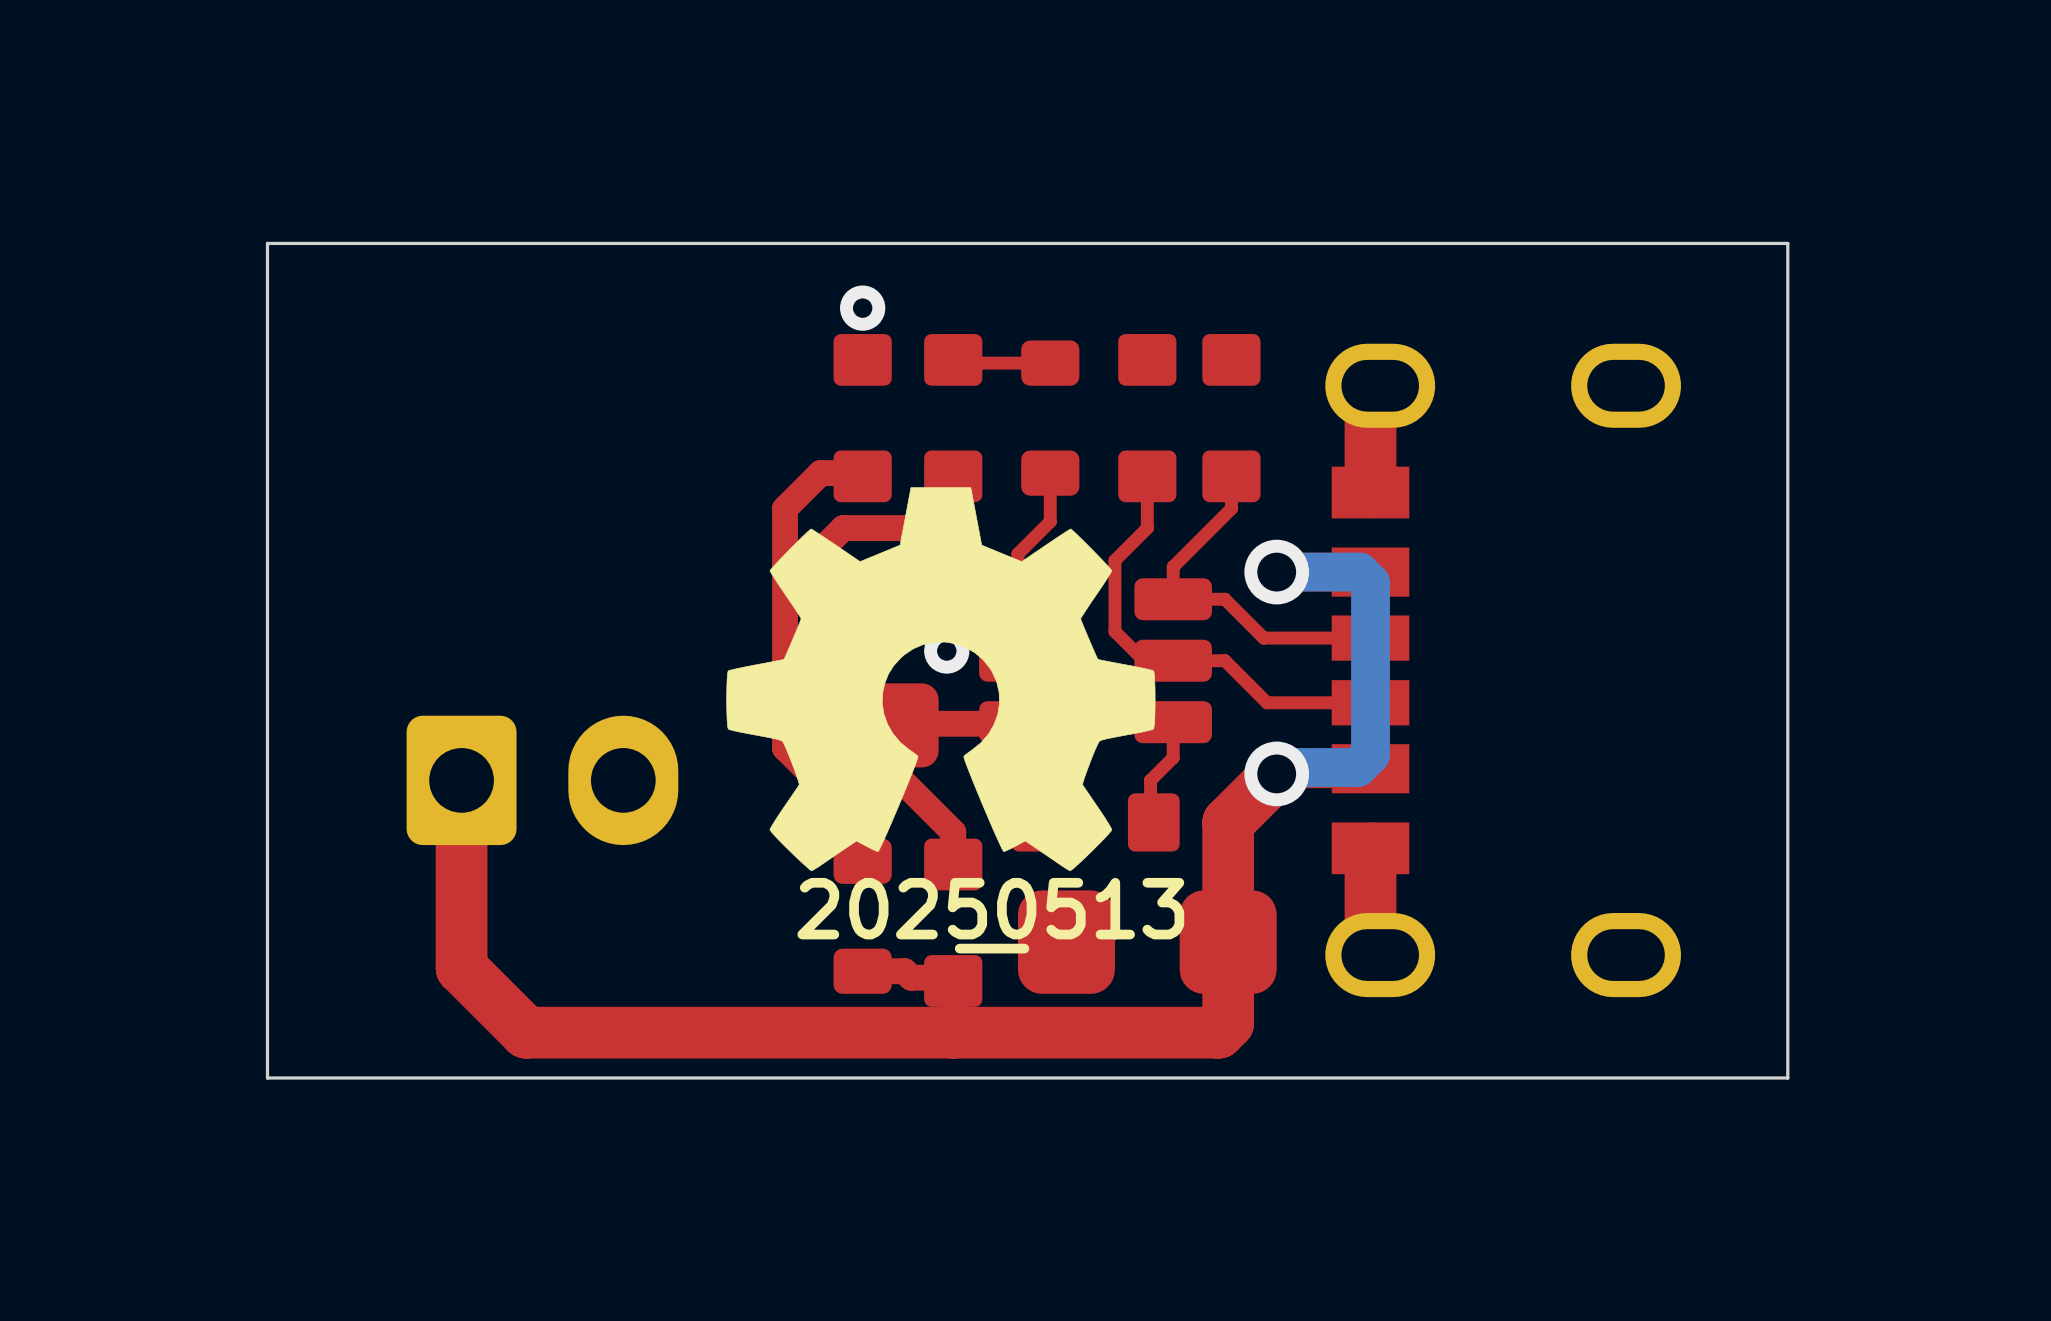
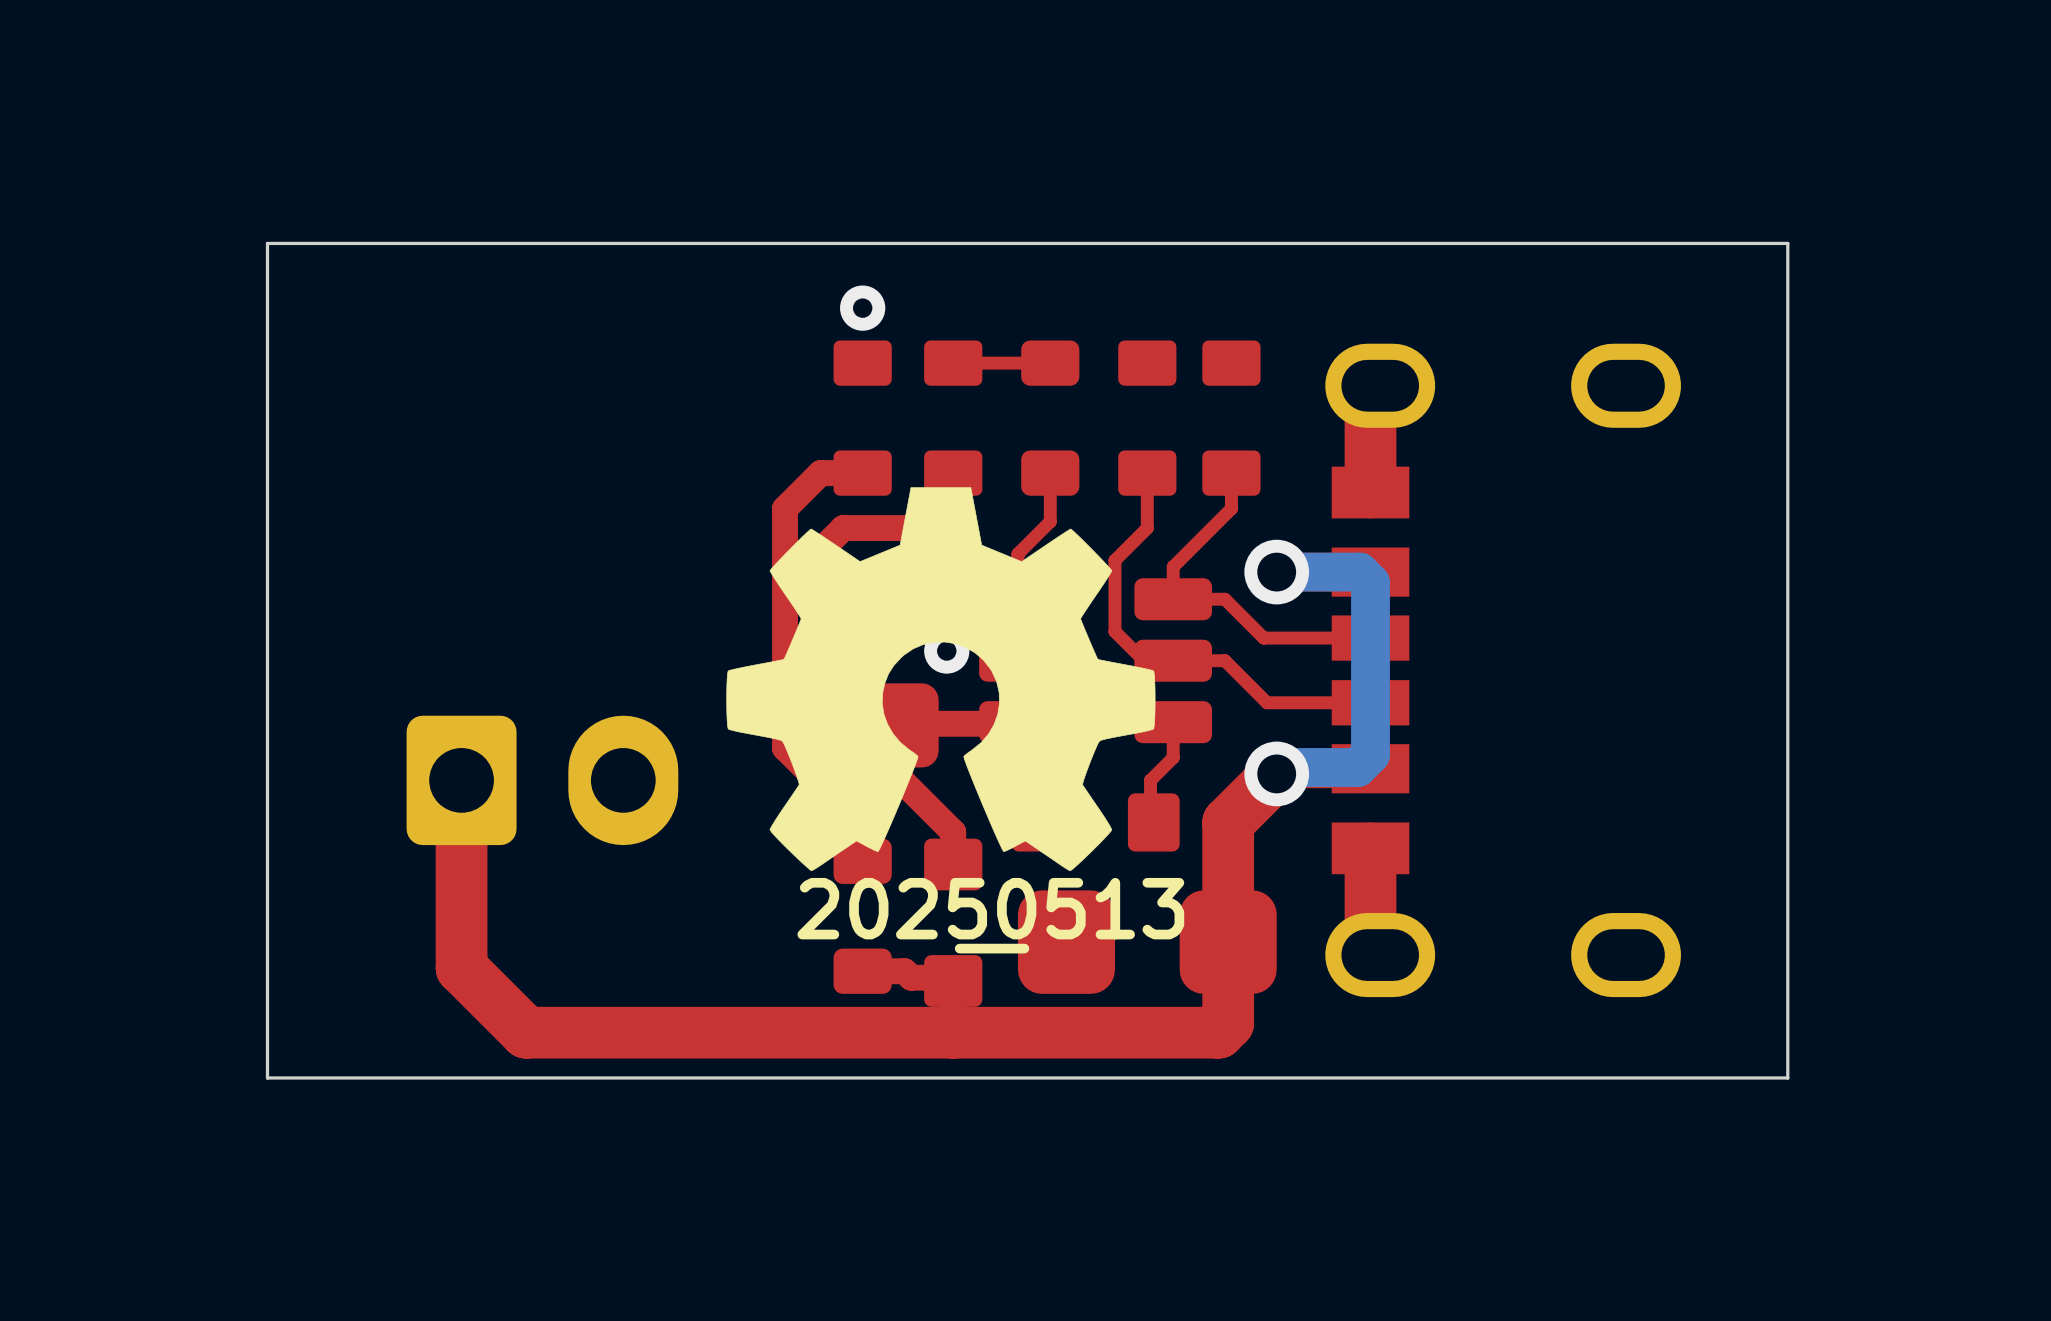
part footprint: [833, 334, 892, 503] -> [833, 340, 892, 496]
part footprint: [924, 334, 983, 503] -> [924, 340, 983, 496]
part footprint: [1118, 334, 1177, 503] -> [1118, 340, 1177, 496]
part footprint: [1202, 334, 1261, 503] -> [1202, 340, 1261, 496]

